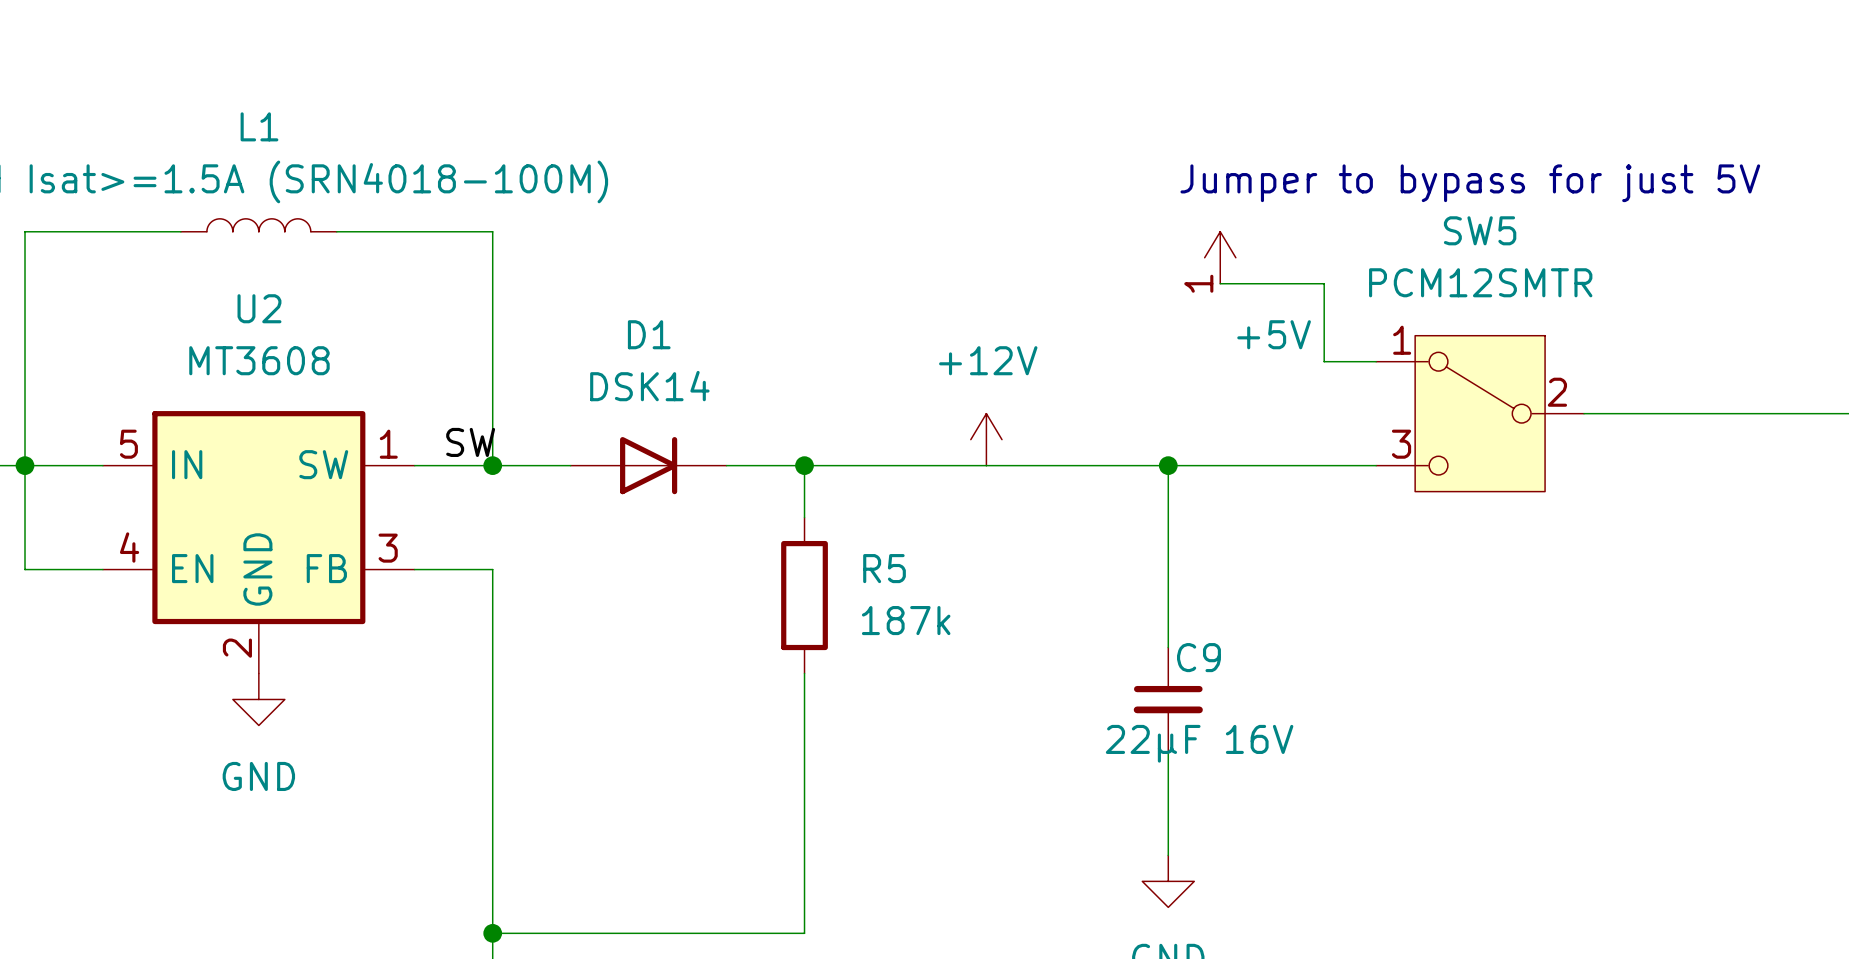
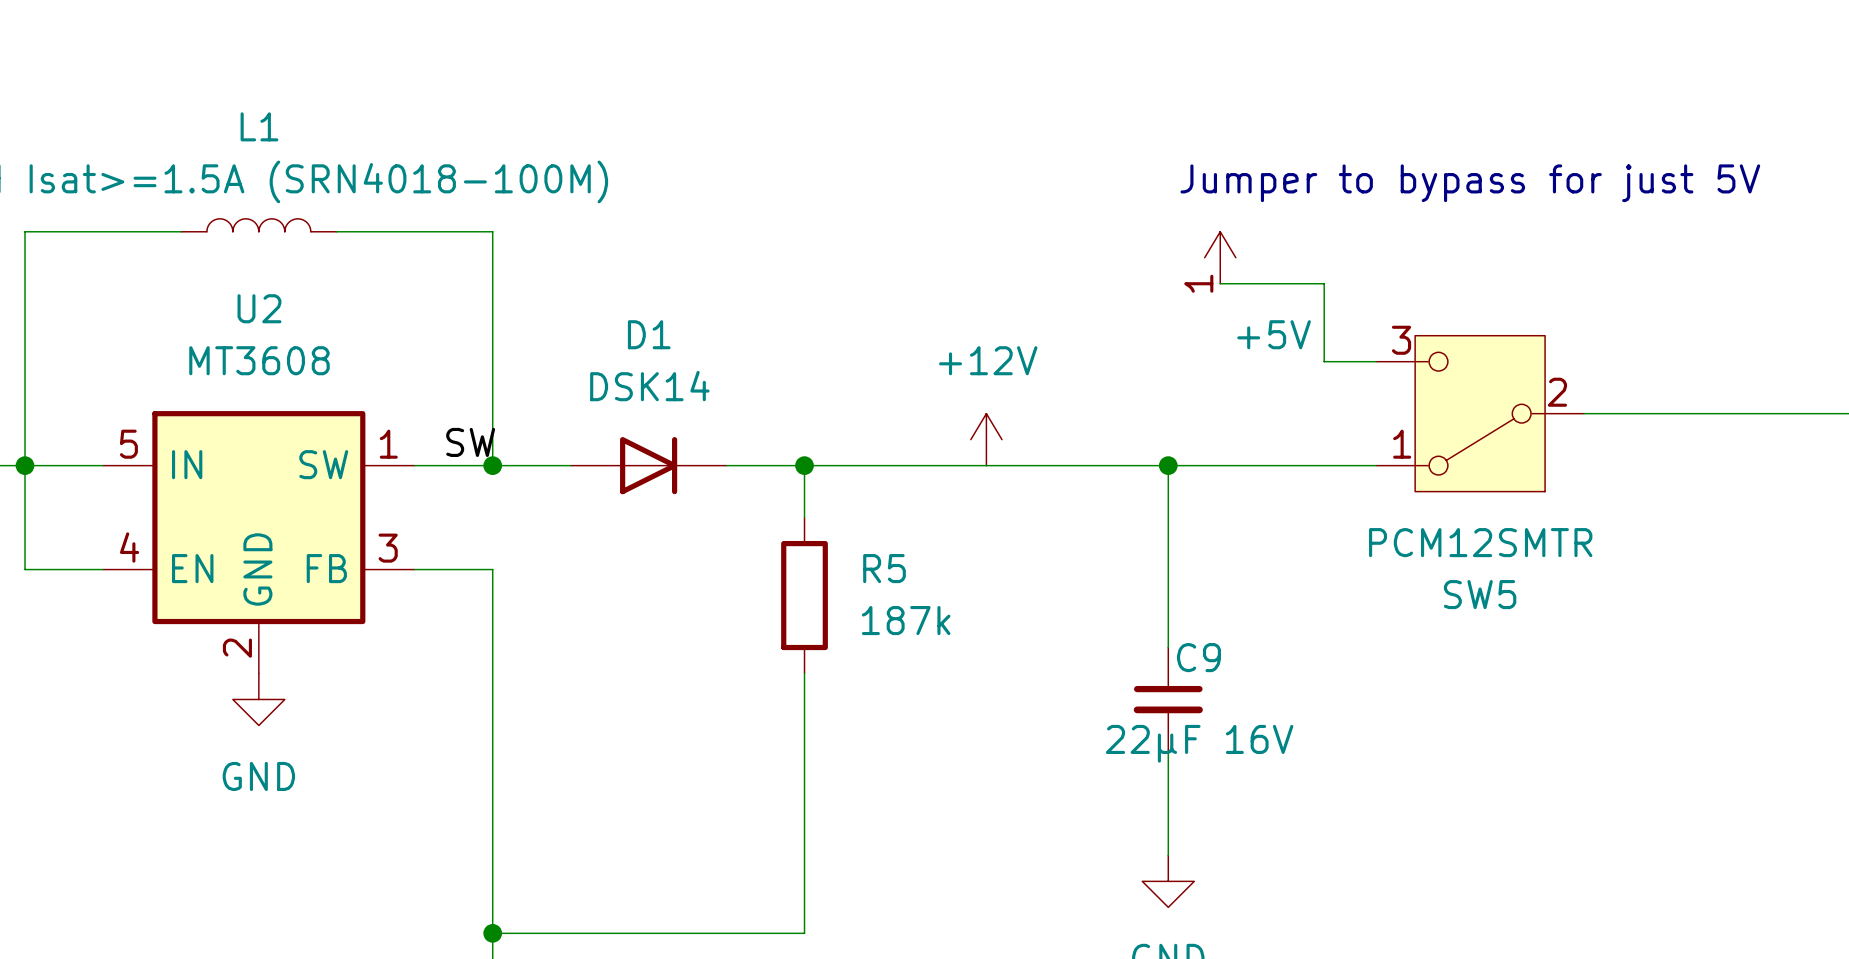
SW5 flip: as is (1480, 413) -> up-down (1480, 413)

